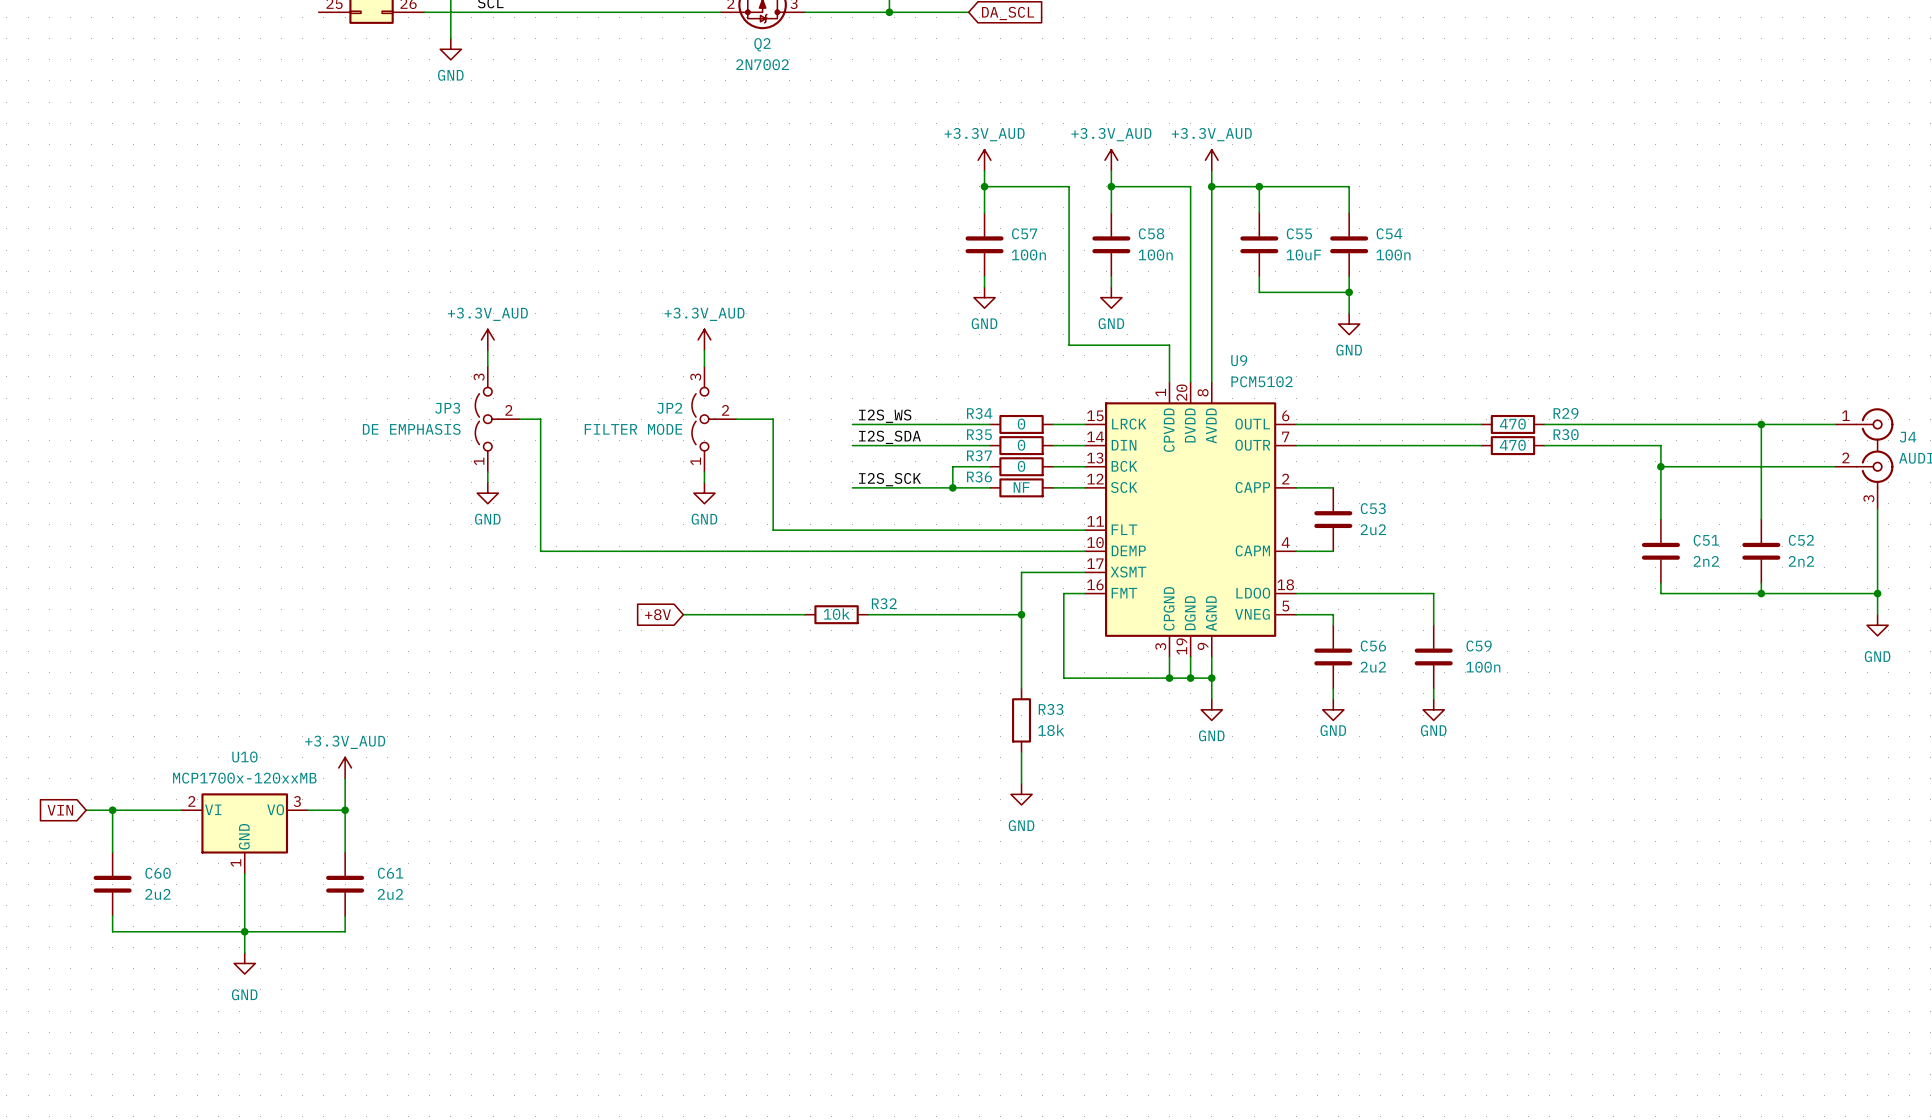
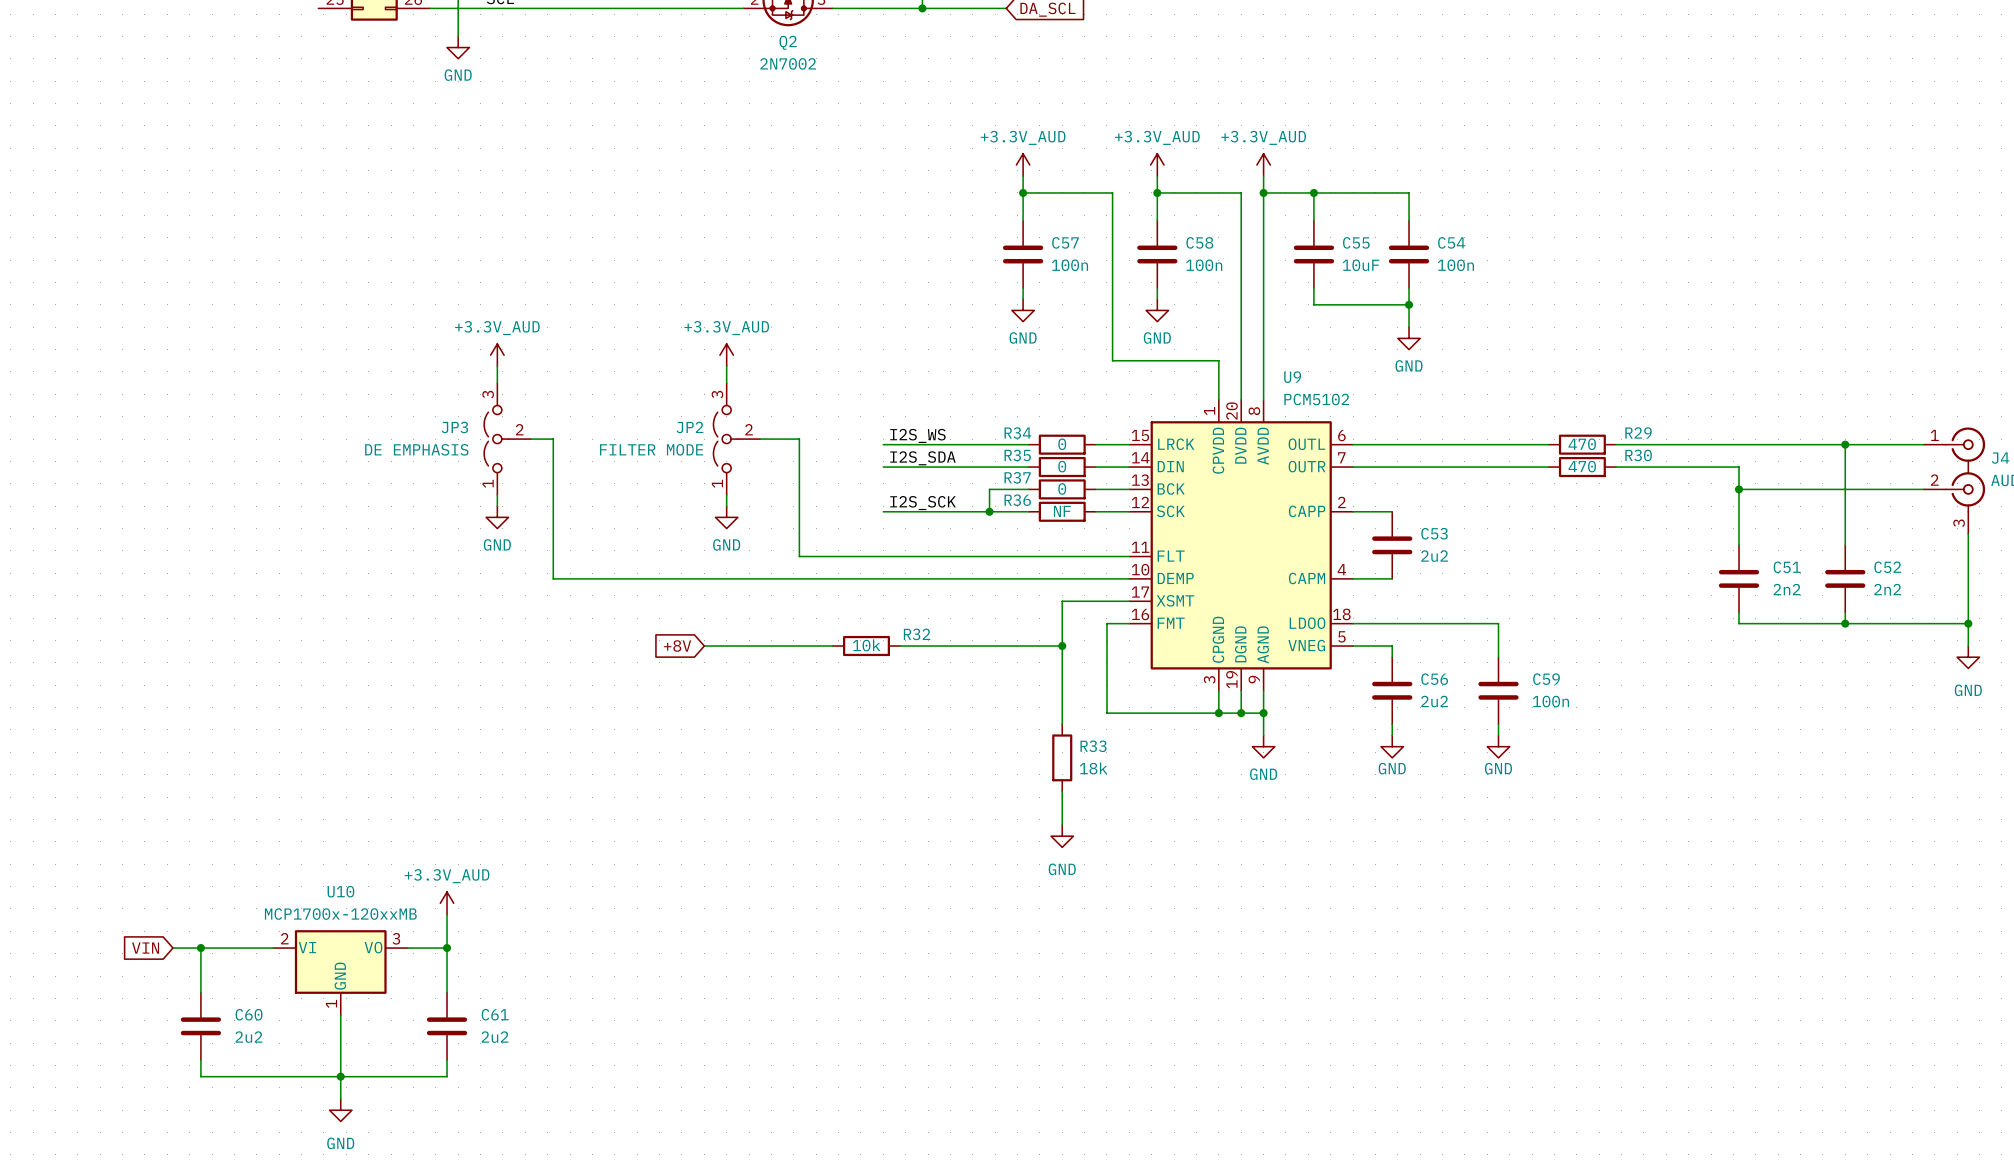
power symbol position: +3.3V_AUD (345, 767) -> +3.3V_AUD (447, 903)
wire: (345, 778) (345, 852) -> (447, 914) (447, 992)
global label position: VIN (60, 810) -> VIN (145, 948)
wire: (86, 810) (181, 810) -> (172, 948) (273, 948)
wire: (112, 810) (112, 852) -> (200, 948) (200, 992)
junction: (112, 810) -> none
wire: (308, 810) (345, 810) -> (407, 948) (447, 948)
junction: (345, 810) -> none
U10 position: (244, 833) -> (340, 972)
wire: (244, 873) (244, 952) -> (340, 1015) (340, 1099)
C60 position: (112, 884) -> (200, 1026)
C61 position: (345, 884) -> (447, 1026)
junction: none -> (447, 948)
wire: (112, 915) (112, 931) (345, 931) (345, 915) -> (200, 1059) (200, 1076) (447, 1076) (447, 1059)
junction position: (244, 931) -> (200, 948)
power symbol position: GND (244, 963) -> GND (340, 1110)
junction: none -> (340, 1076)

